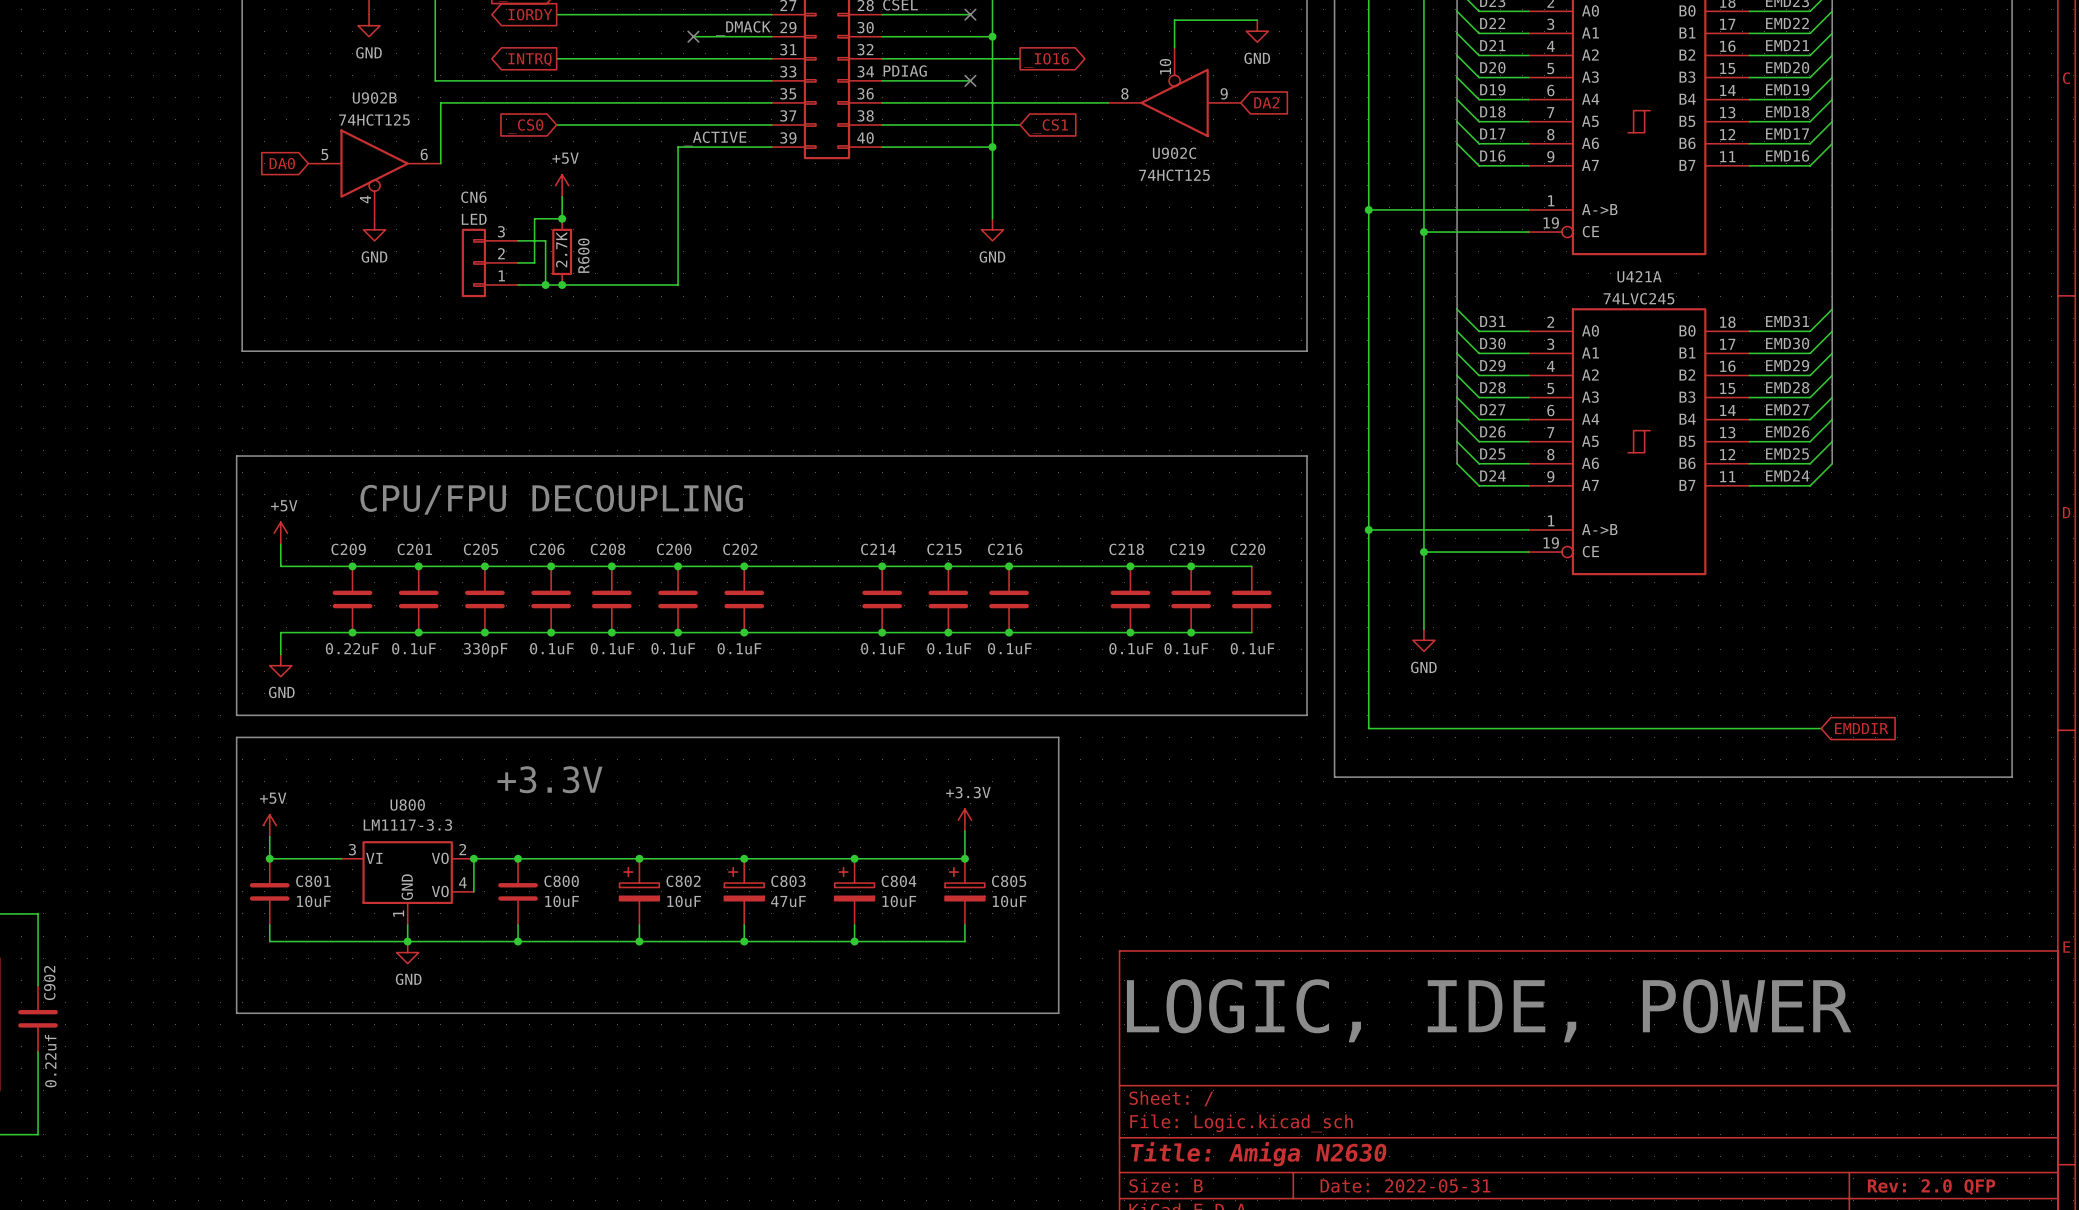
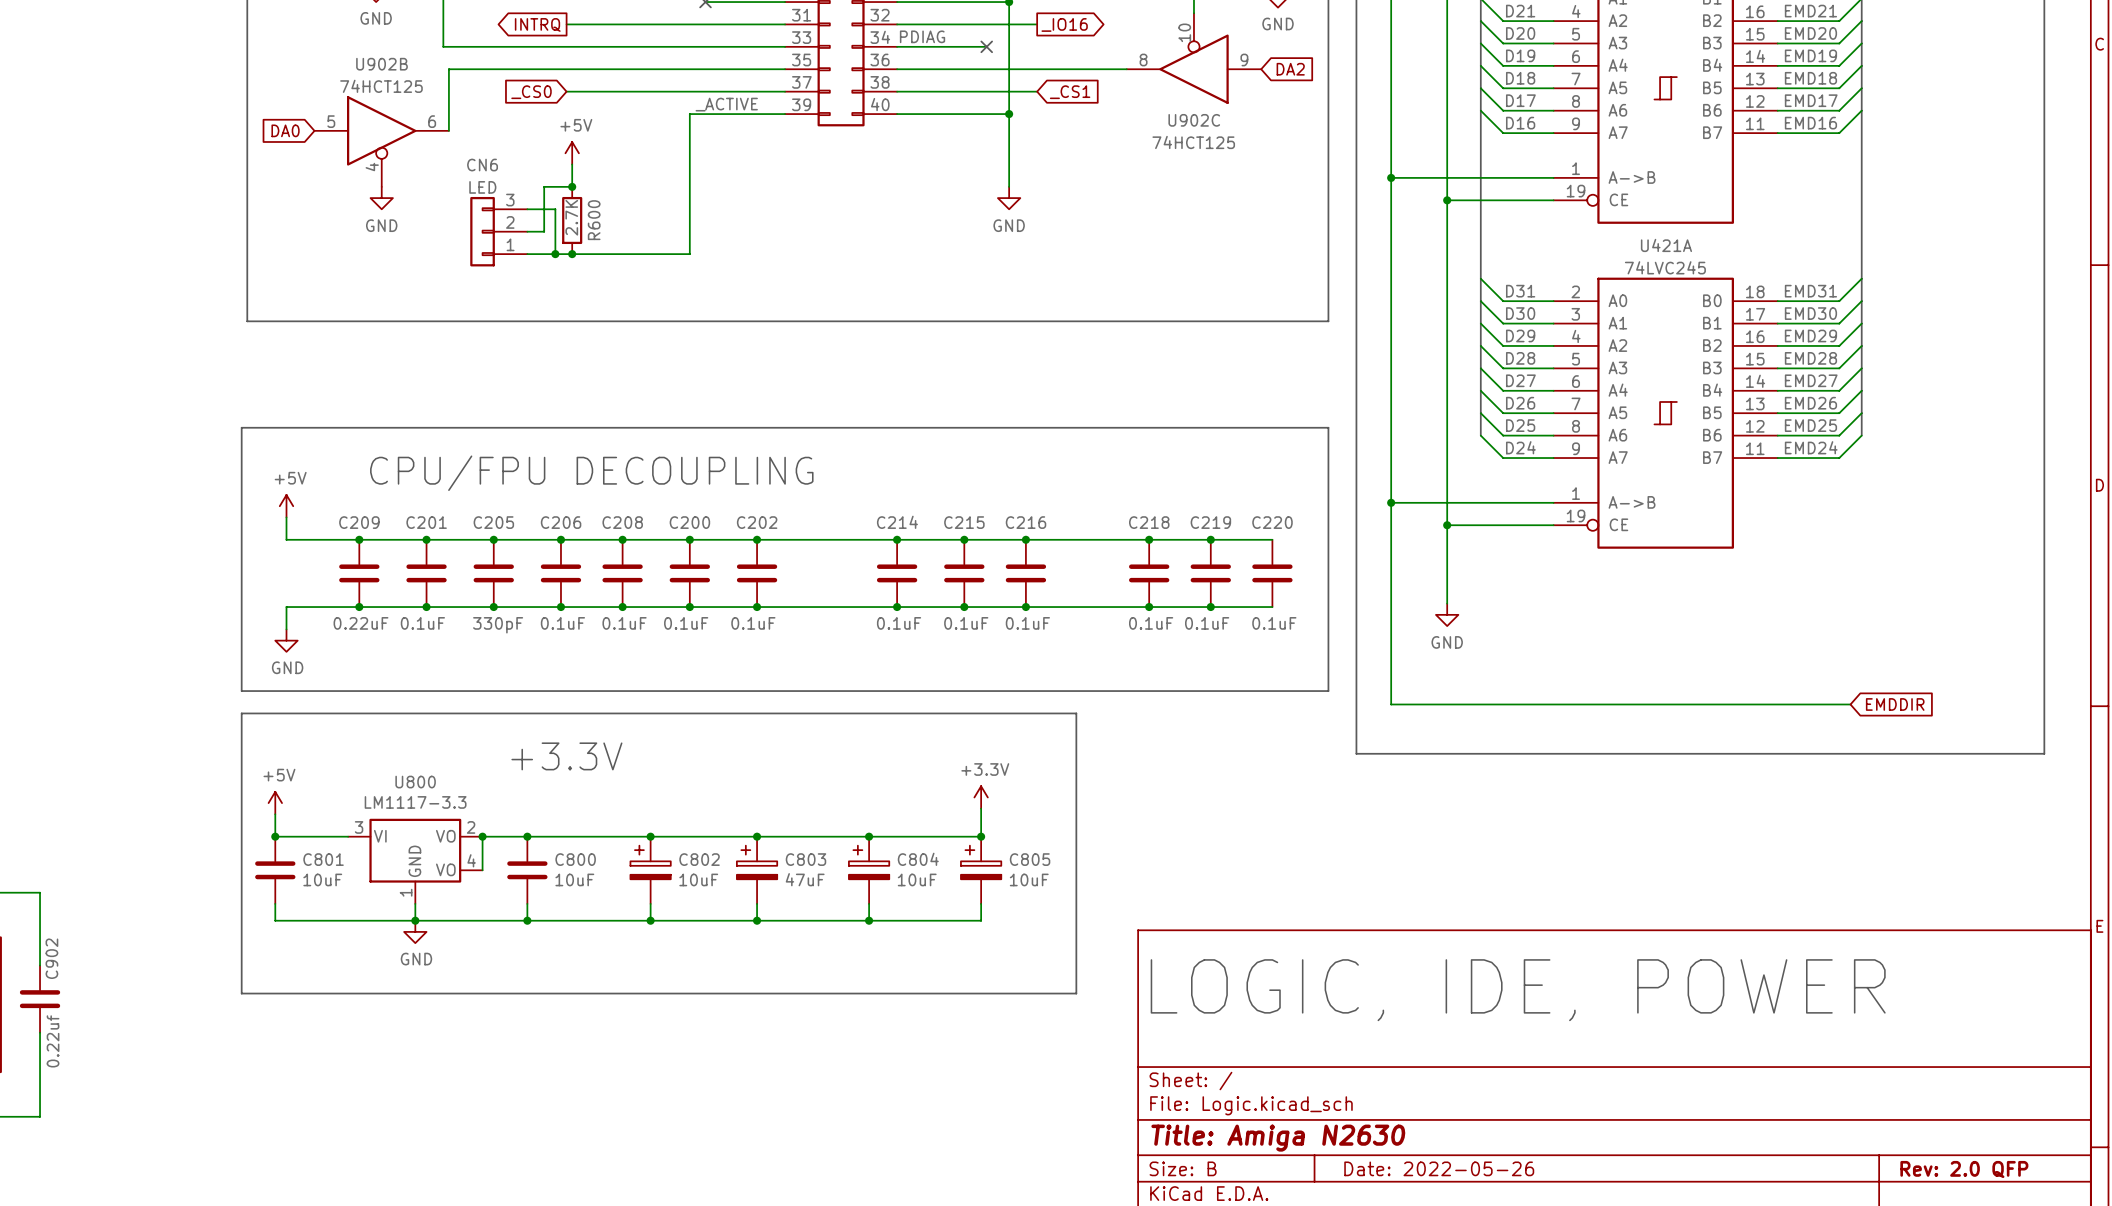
title block: Date: 2022-05-31 (1405, 1185) -> Date: 2022-05-26 (1439, 1168)

